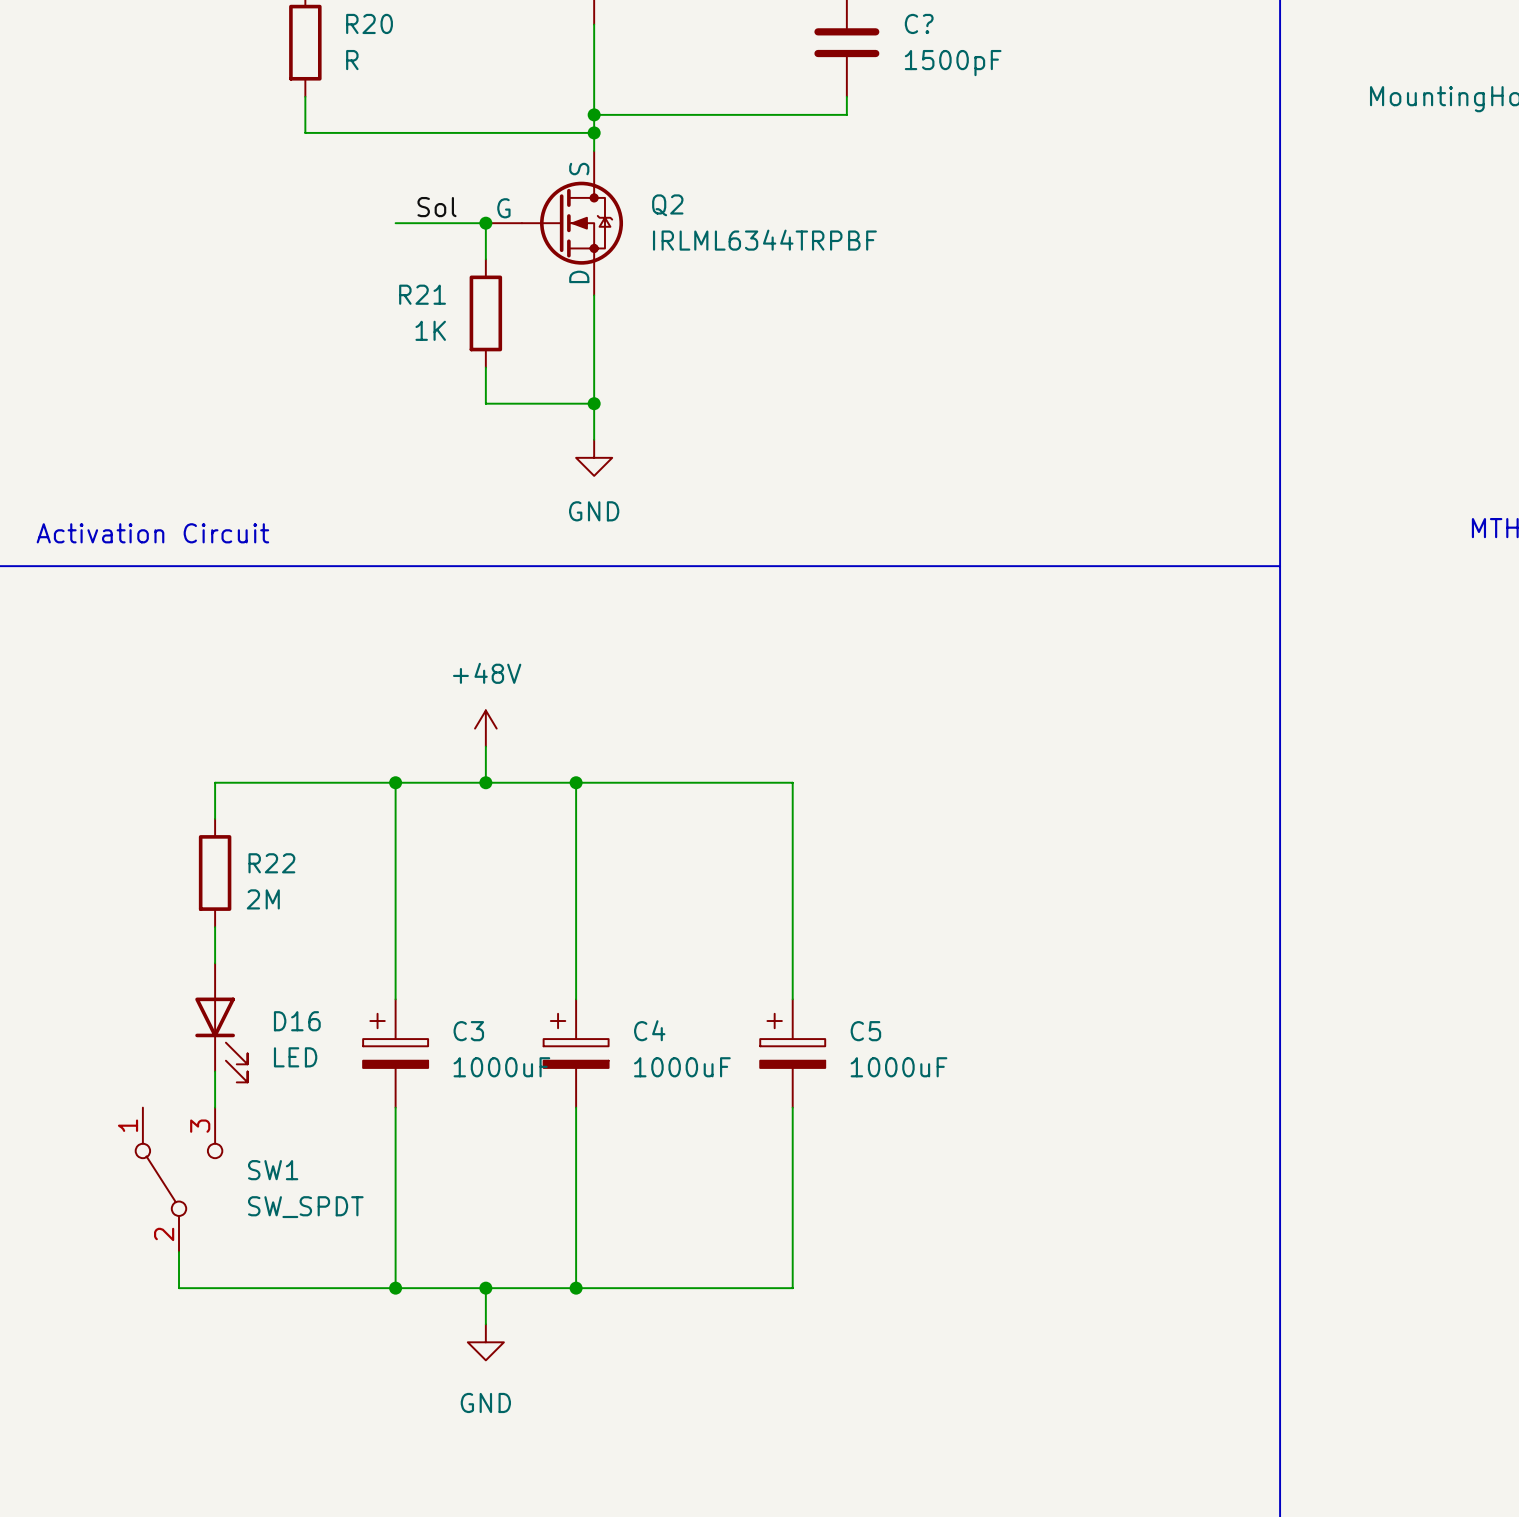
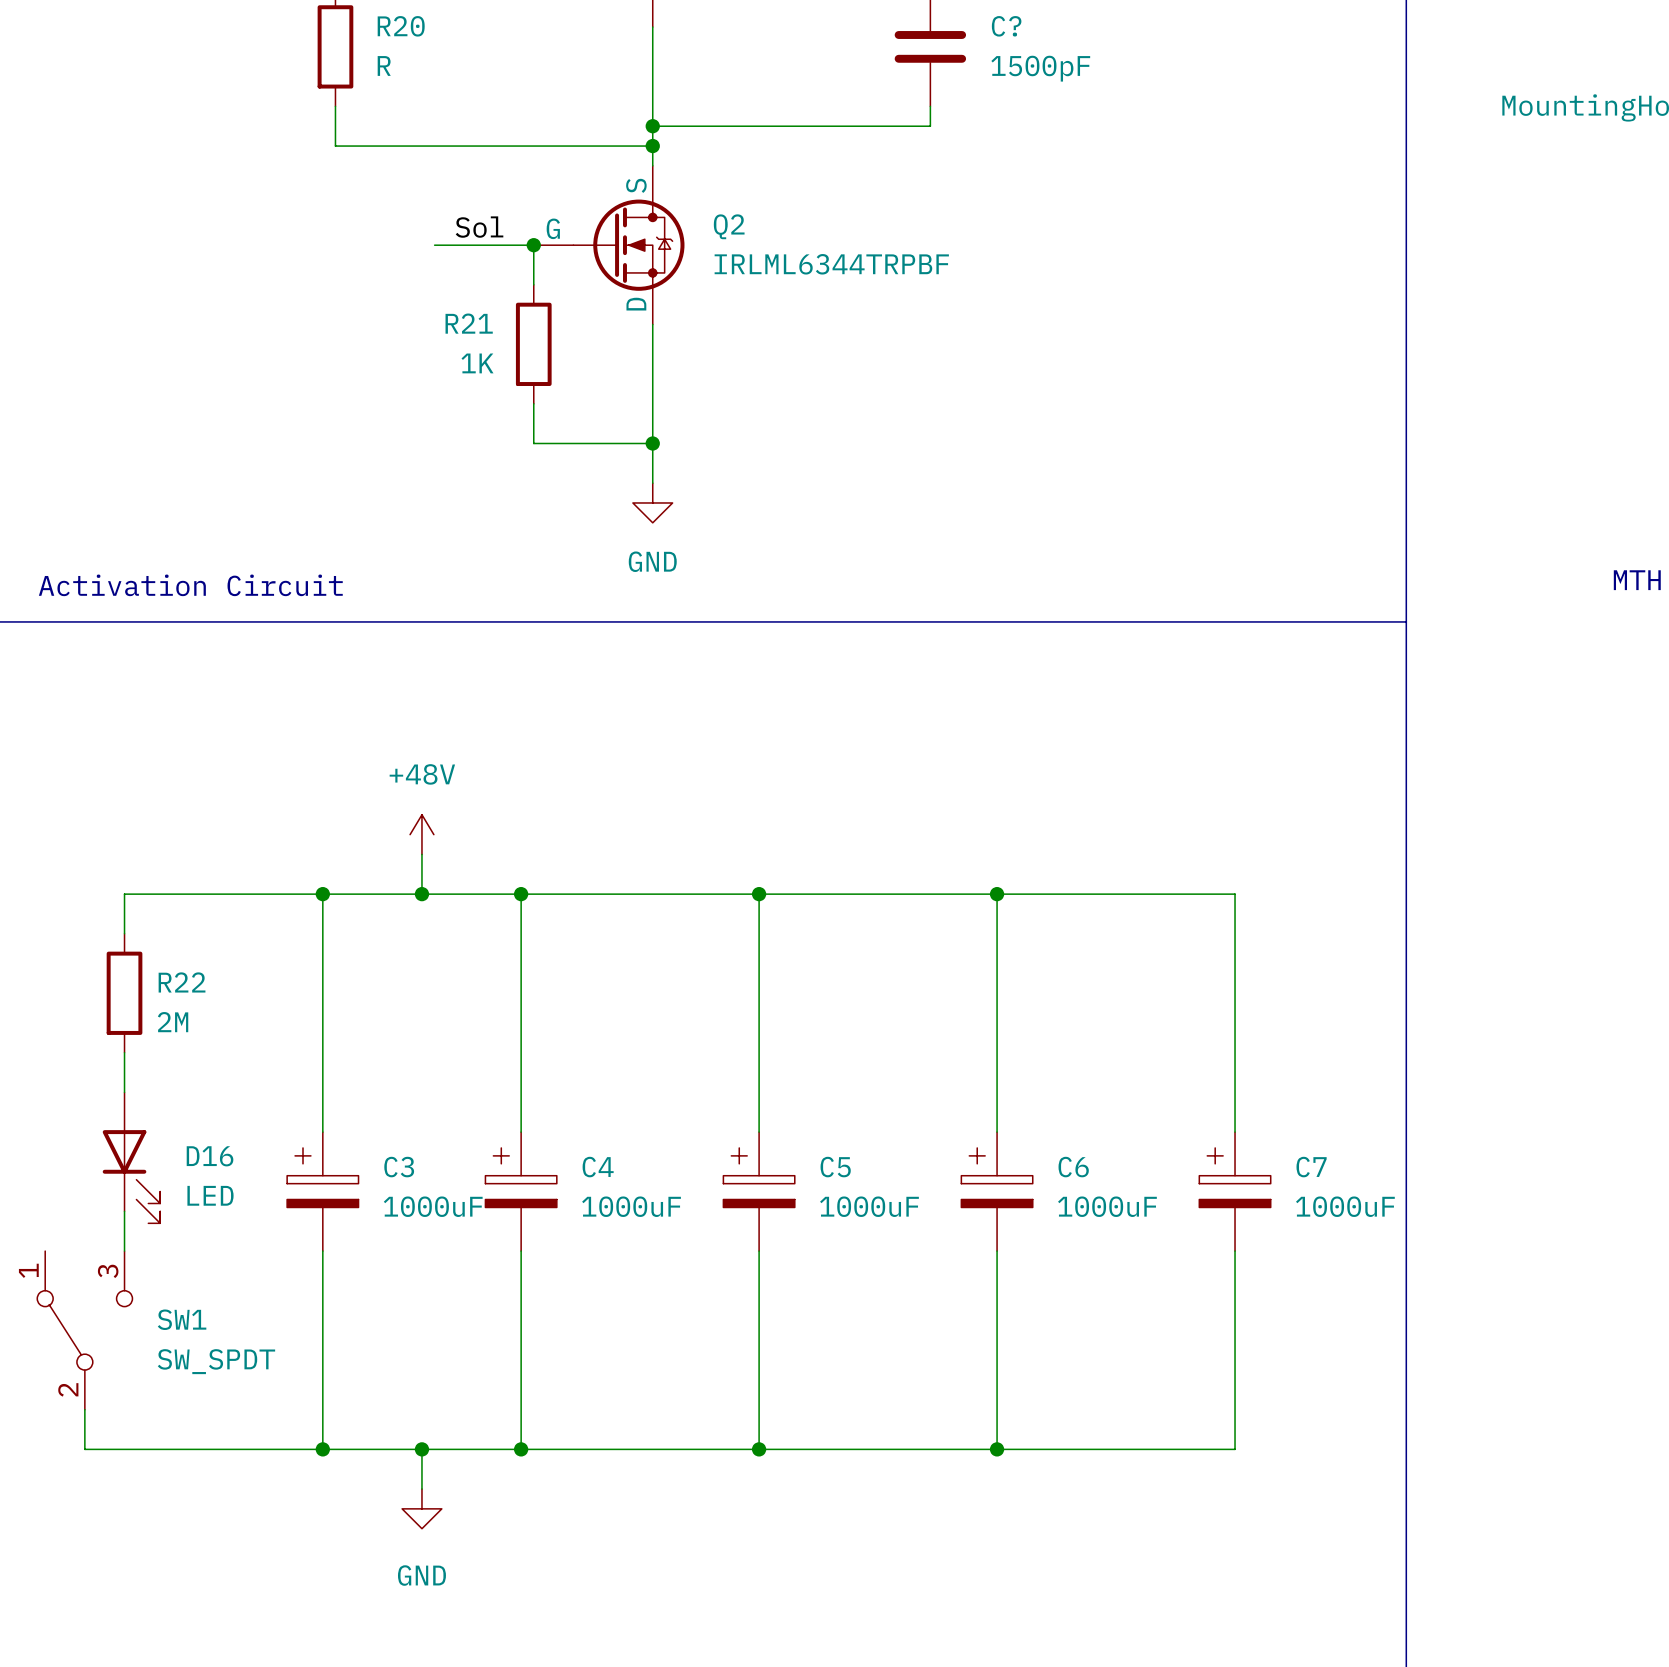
power symbol position: +48V (485, 728) -> +48V (421, 834)
wire: (485, 746) (485, 782) -> (421, 854) (421, 894)
wire: (395, 782) (395, 999) -> (322, 894) (322, 1132)
junction position: (395, 782) -> (421, 894)
junction position: (485, 782) -> (521, 894)
wire: (576, 782) (576, 999) -> (521, 894) (521, 1132)
junction: (576, 782) -> none
junction: none -> (322, 894)
wire: none -> (759, 894) (759, 1132)
junction: none -> (759, 894)
wire: none -> (997, 894) (997, 1132)
junction: none -> (997, 894)
wire: (215, 818) (215, 782) (792, 782) (792, 999) -> none
wire: none -> (124, 933) (124, 894) (1235, 894) (1235, 1132)
R22 position: (215, 872) -> (124, 993)
wire: (215, 927) (215, 963) -> (124, 1052) (124, 1092)
D16 position: (221, 1022) -> (131, 1157)
C3 position: (395, 1053) -> (322, 1191)
C4 position: (576, 1053) -> (521, 1191)
C5 position: (792, 1053) -> (759, 1191)
wire: (215, 1071) (215, 1107) -> (124, 1211) (124, 1251)
C6: none -> 1000uF (997, 1191)
C7: none -> 1000uF (1235, 1191)
wire: (395, 1107) (395, 1288) -> (322, 1251) (322, 1449)
wire: (576, 1107) (576, 1288) -> (521, 1251) (521, 1449)
wire: (792, 1107) (792, 1288) (179, 1288) (179, 1252) -> none
wire: none -> (759, 1251) (759, 1449)
wire: none -> (997, 1251) (997, 1449)
wire: none -> (1235, 1251) (1235, 1449) (84, 1449) (84, 1409)
SW1 position: (179, 1179) -> (84, 1330)
junction position: (395, 1288) -> (421, 1449)
wire: (485, 1288) (485, 1324) -> (421, 1449) (421, 1489)
junction position: (485, 1288) -> (521, 1449)
junction: (576, 1288) -> none
junction: none -> (322, 1449)
junction: none -> (759, 1449)
junction: none -> (997, 1449)
power symbol position: GND (485, 1342) -> GND (421, 1508)

